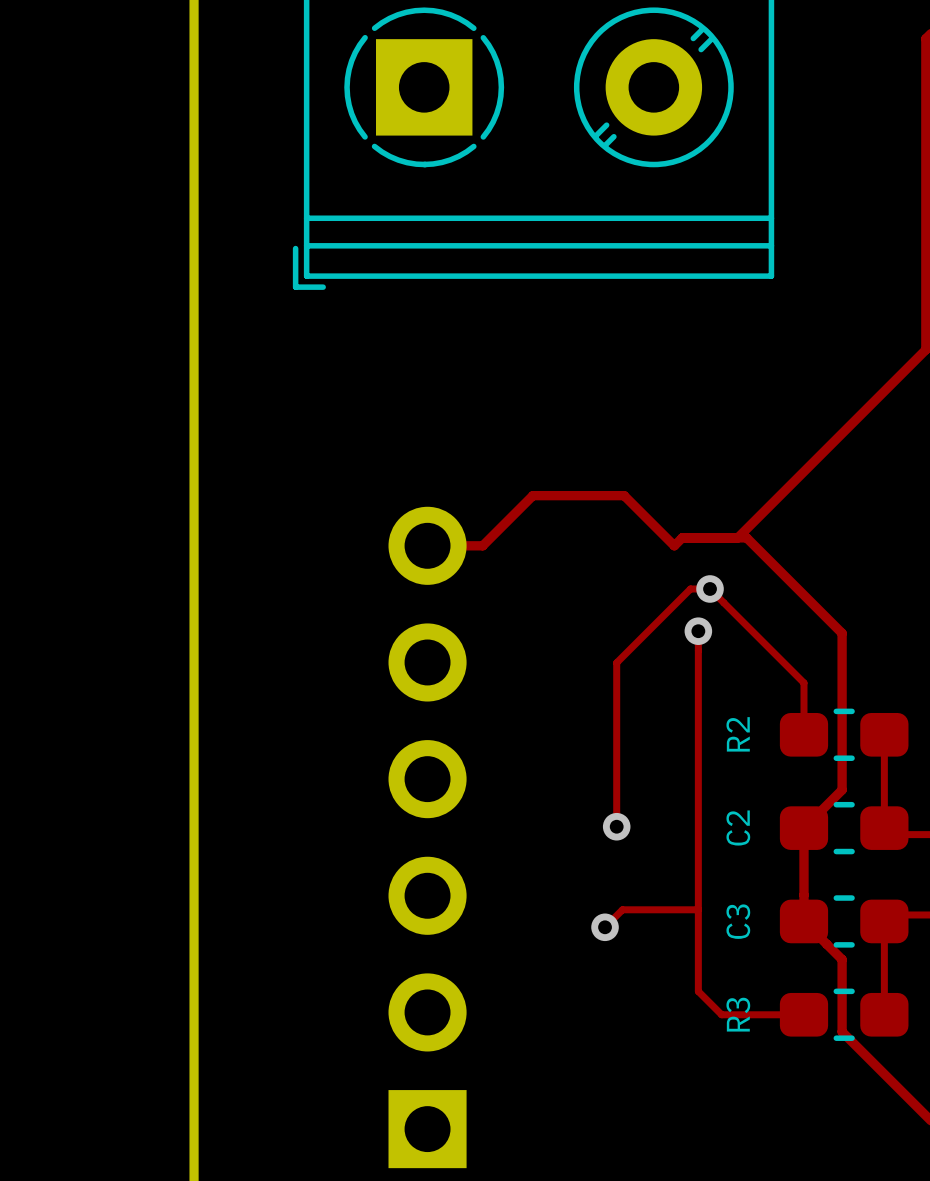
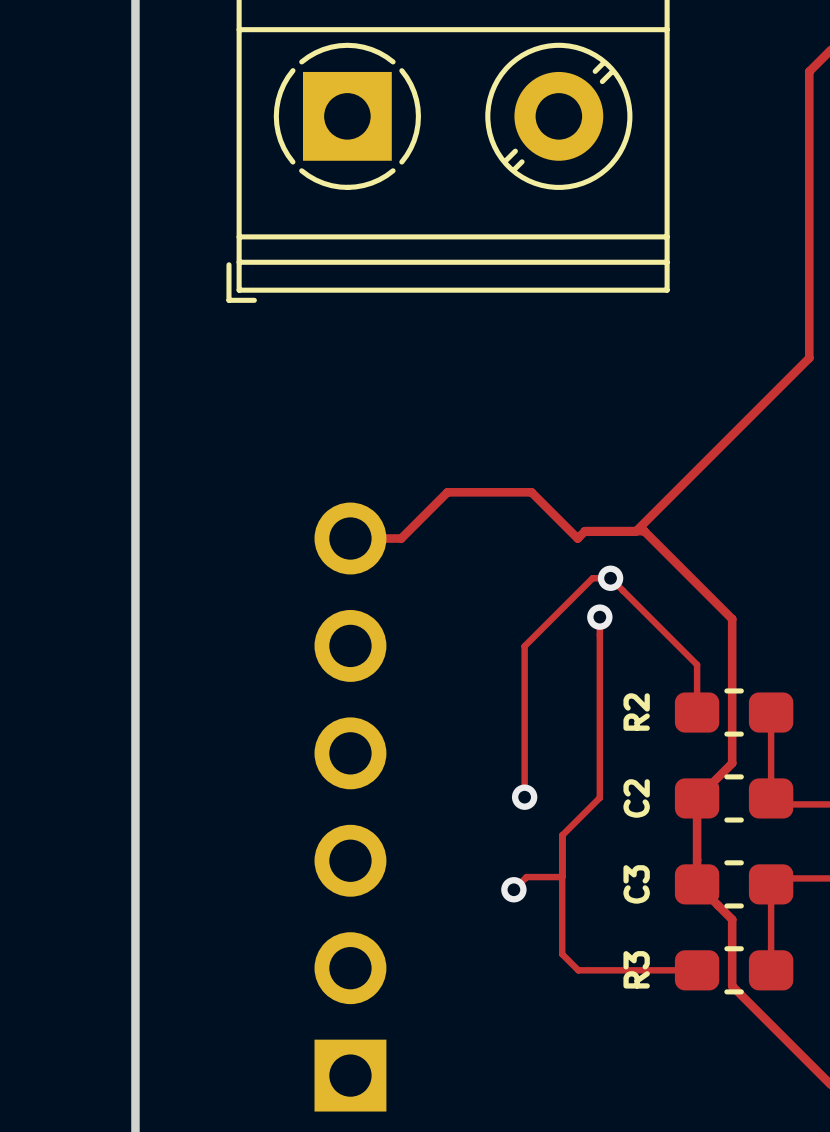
track: (698, 827) (698, 991) (721, 1014) -> (599, 797) (562, 835) (562, 954) (578, 970) (621, 970)
track: (698, 909) (622, 909) (618, 913) -> (562, 877) (526, 877)

